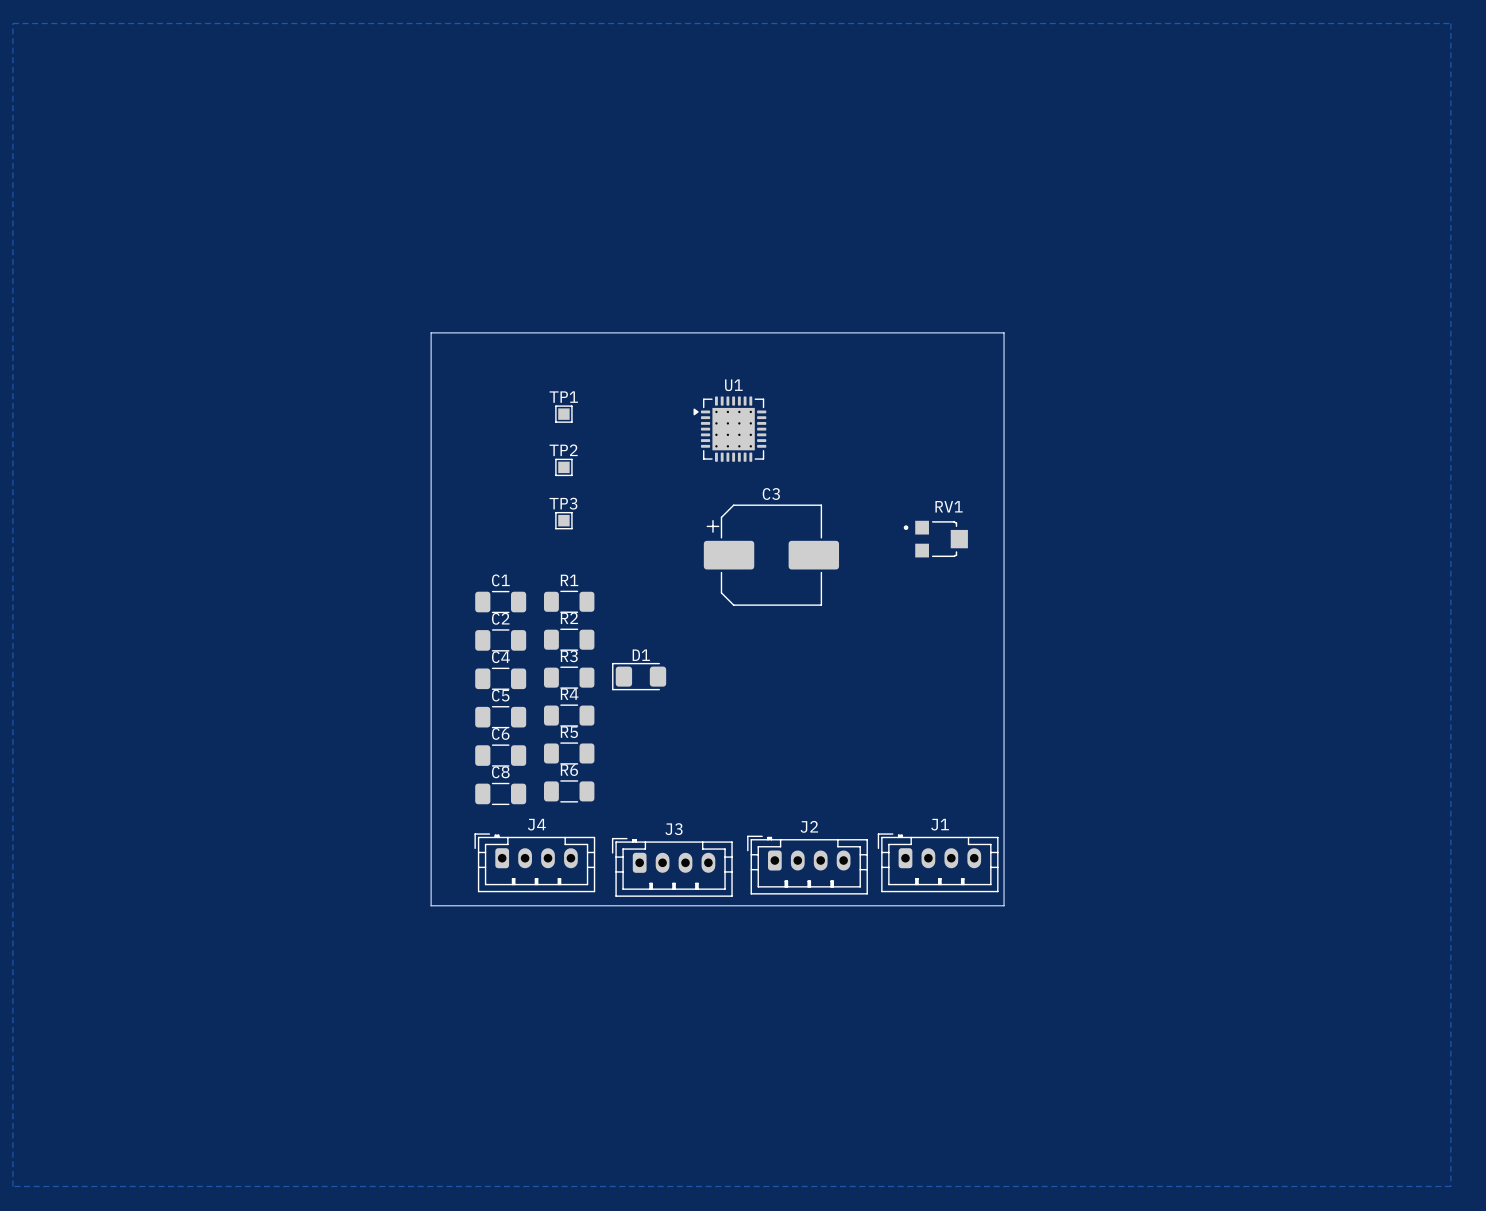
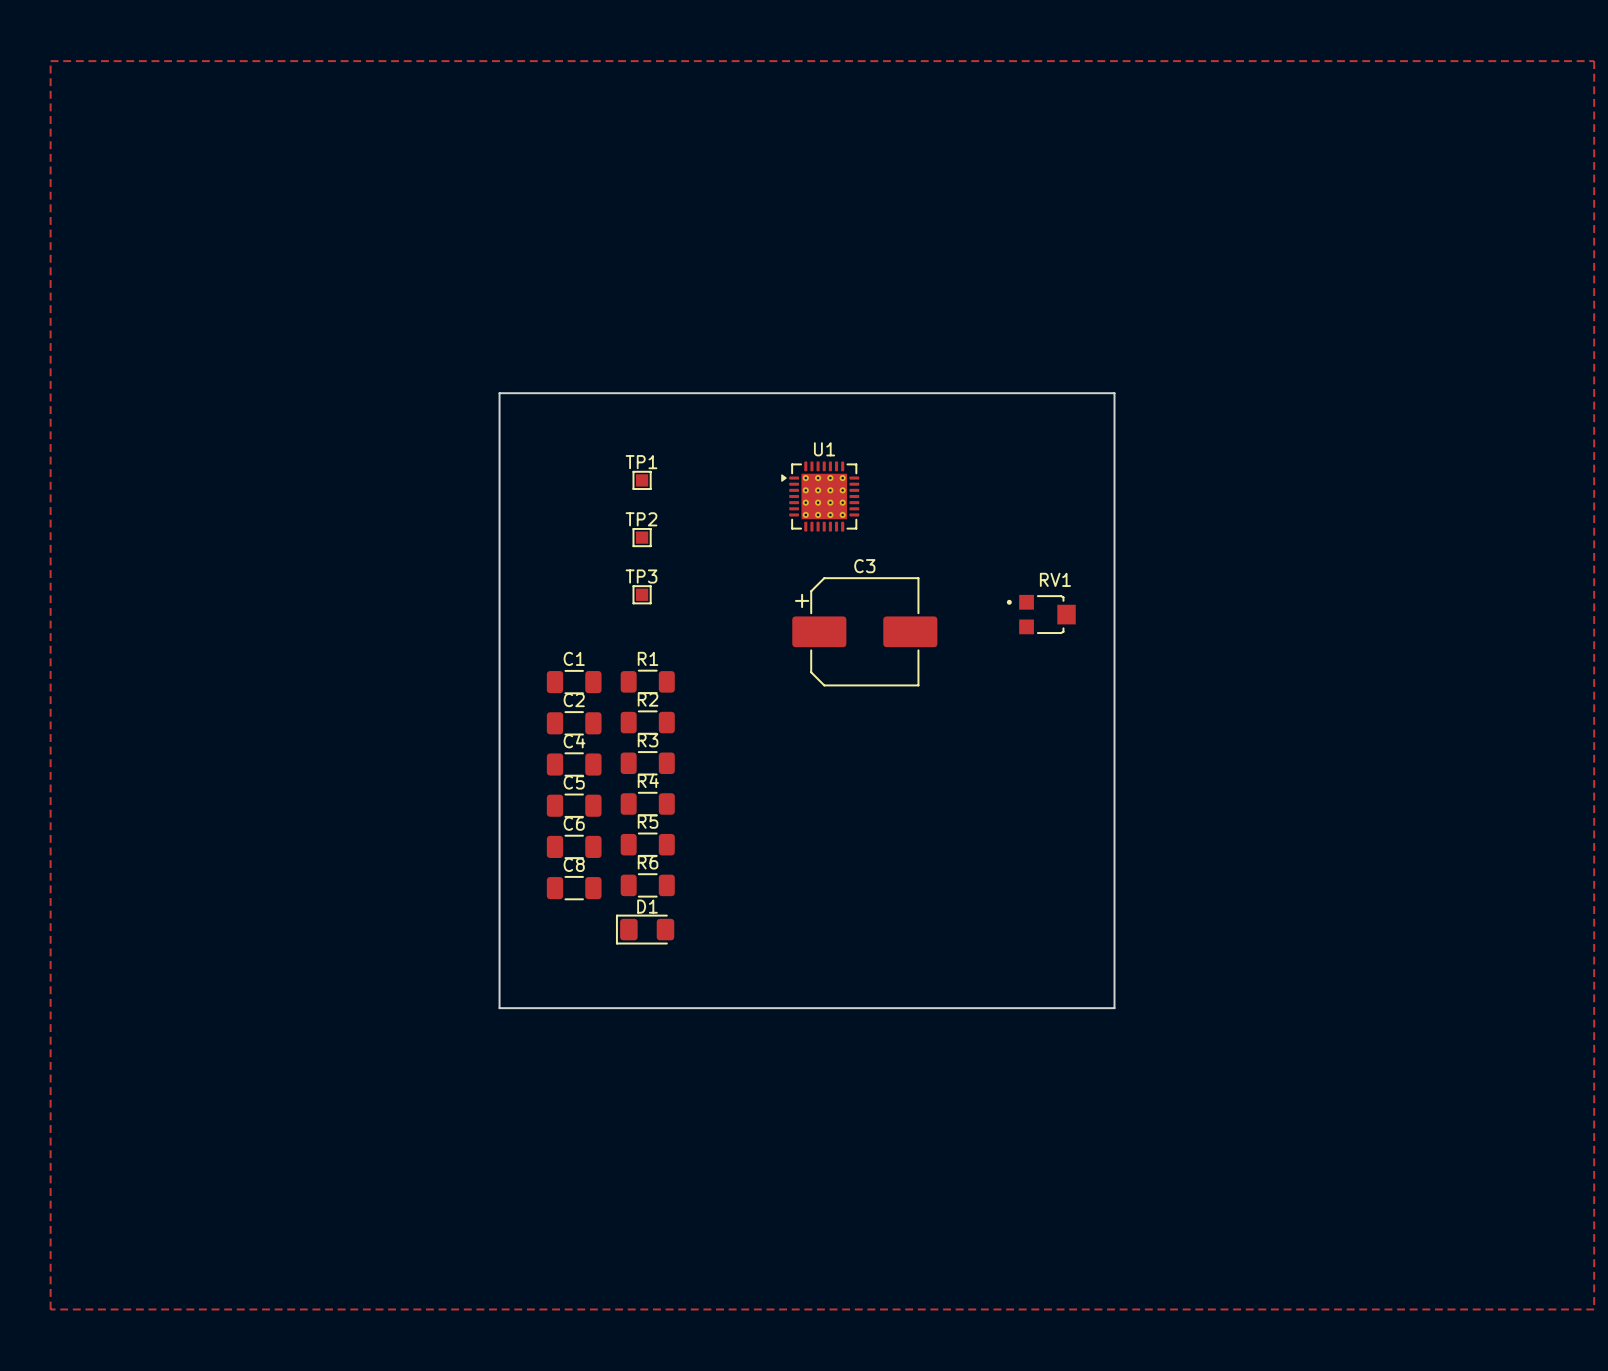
D1 position: (639, 676) -> (645, 929)
J4: (534, 862) -> none
J1: (938, 862) -> none
J2: (807, 865) -> none
J3: (672, 867) -> none

